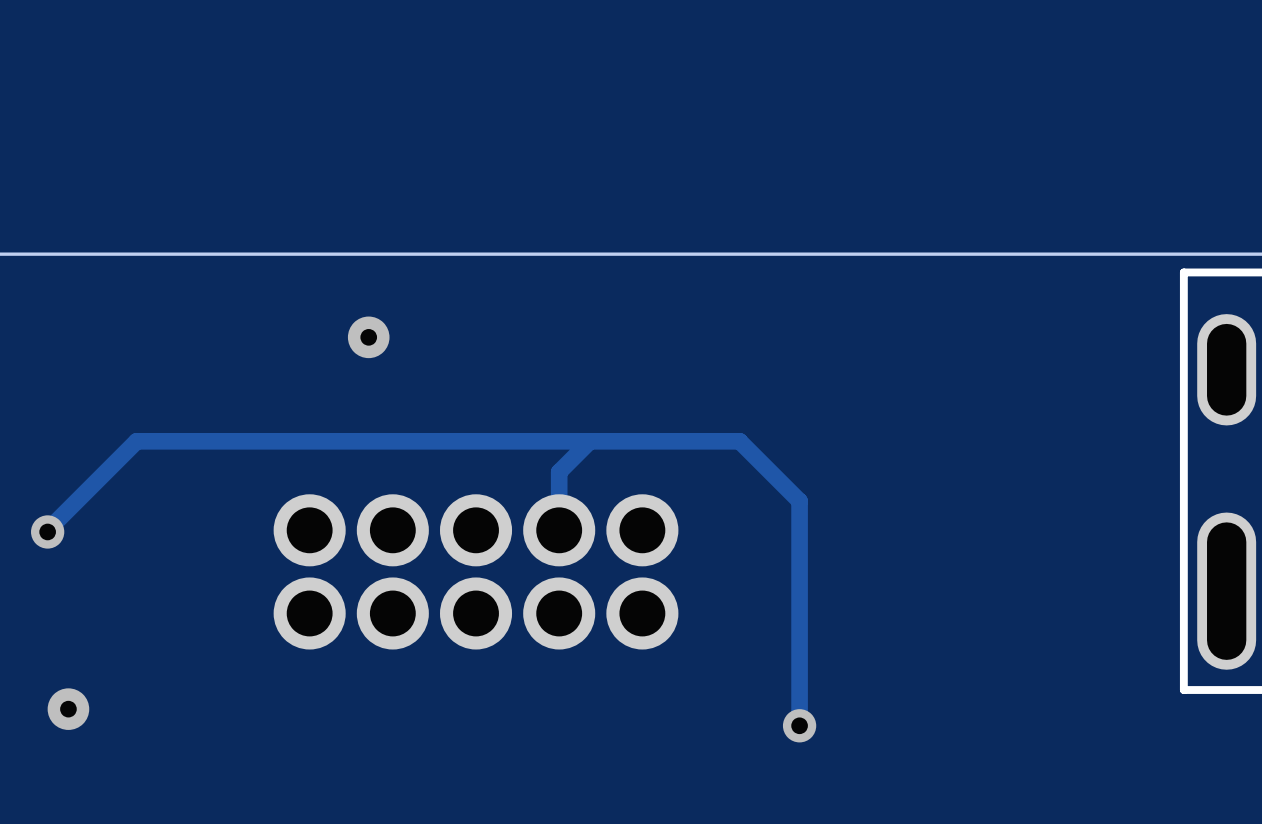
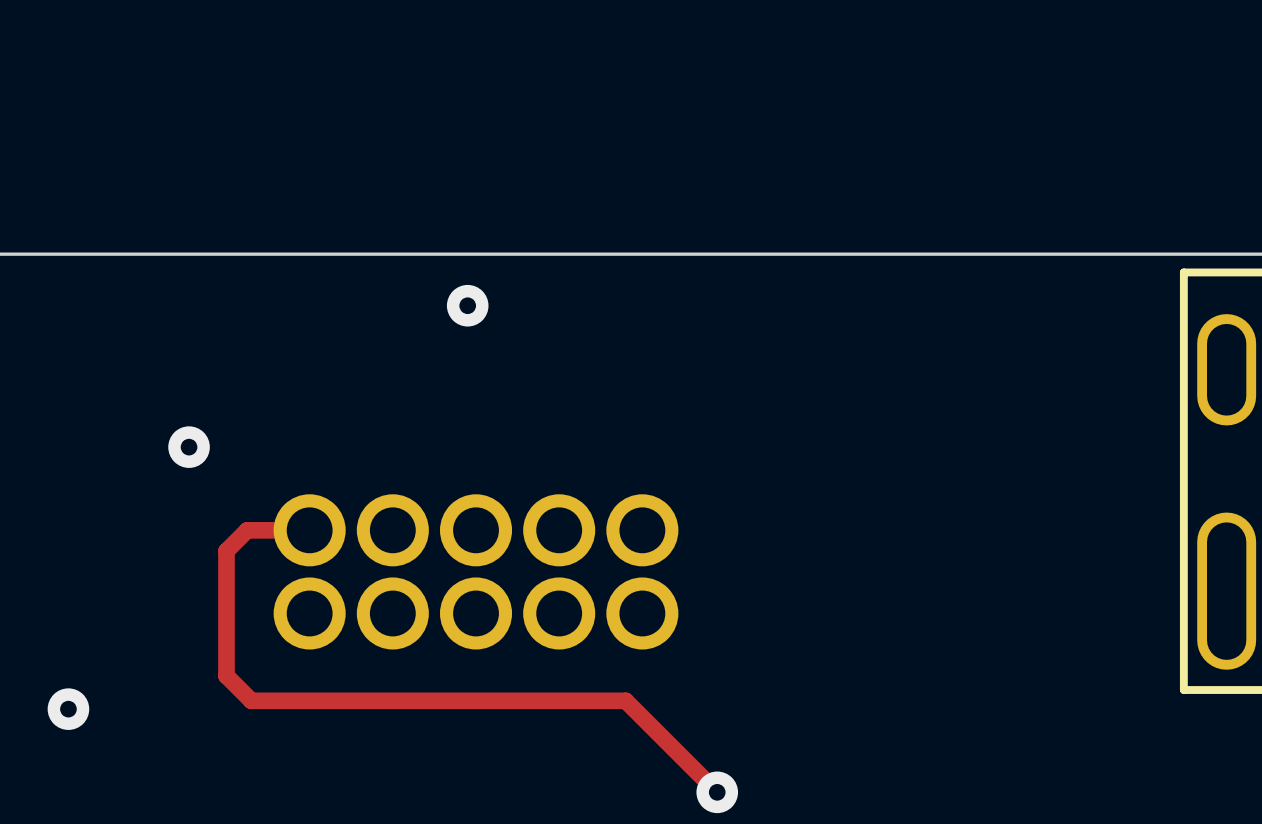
via position: (368, 337) -> (467, 305)
track: (589, 441) (559, 472) (559, 530) -> none
via: none -> (189, 447)
track: none -> (309, 530) (247, 530) (226, 551) (226, 675) (251, 700) (625, 700) (717, 792)
track: (47, 531) (136, 441) (739, 441) (799, 501) (799, 725) -> none
via: (47, 531) -> none
via: (799, 725) -> none
via: none -> (717, 792)

